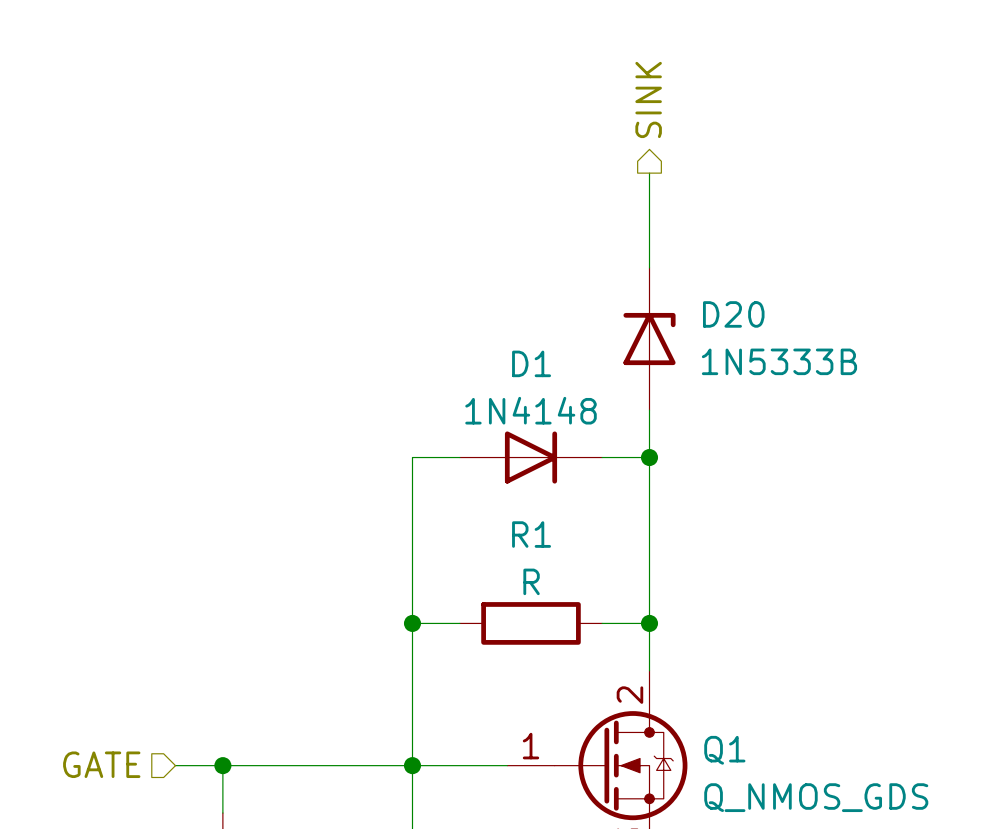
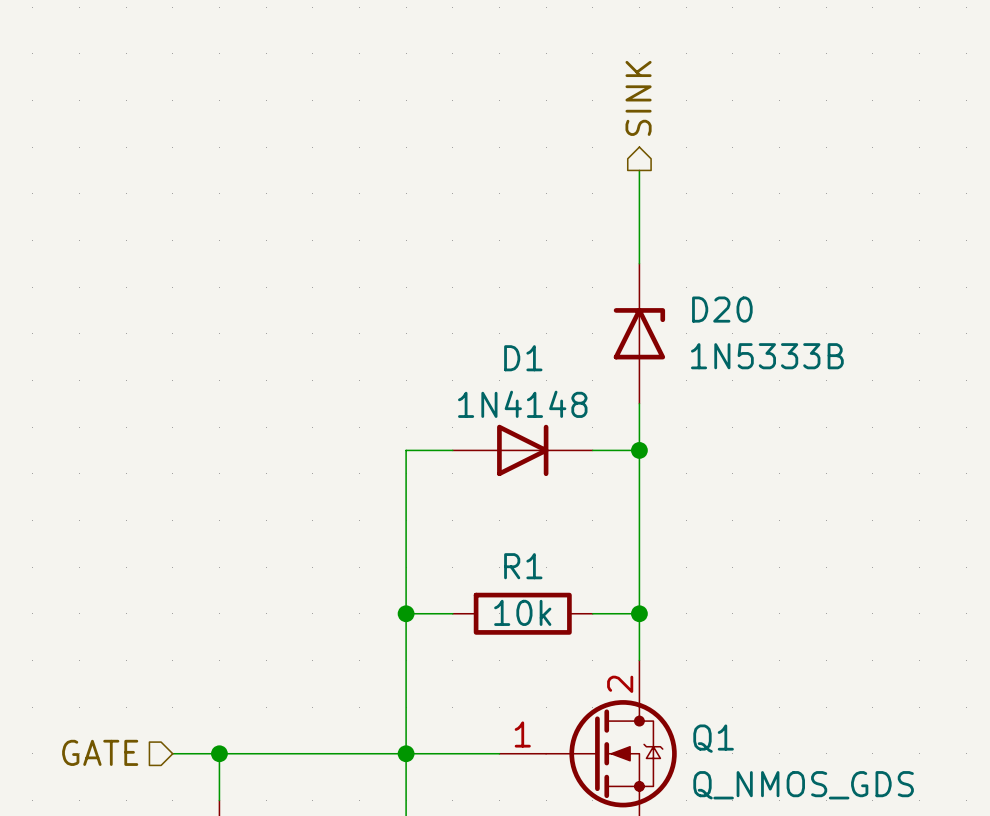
R1 name position: R1 (531, 534) -> R1 (523, 566)
R1 value: R (531, 581) -> 10k (522, 612)

